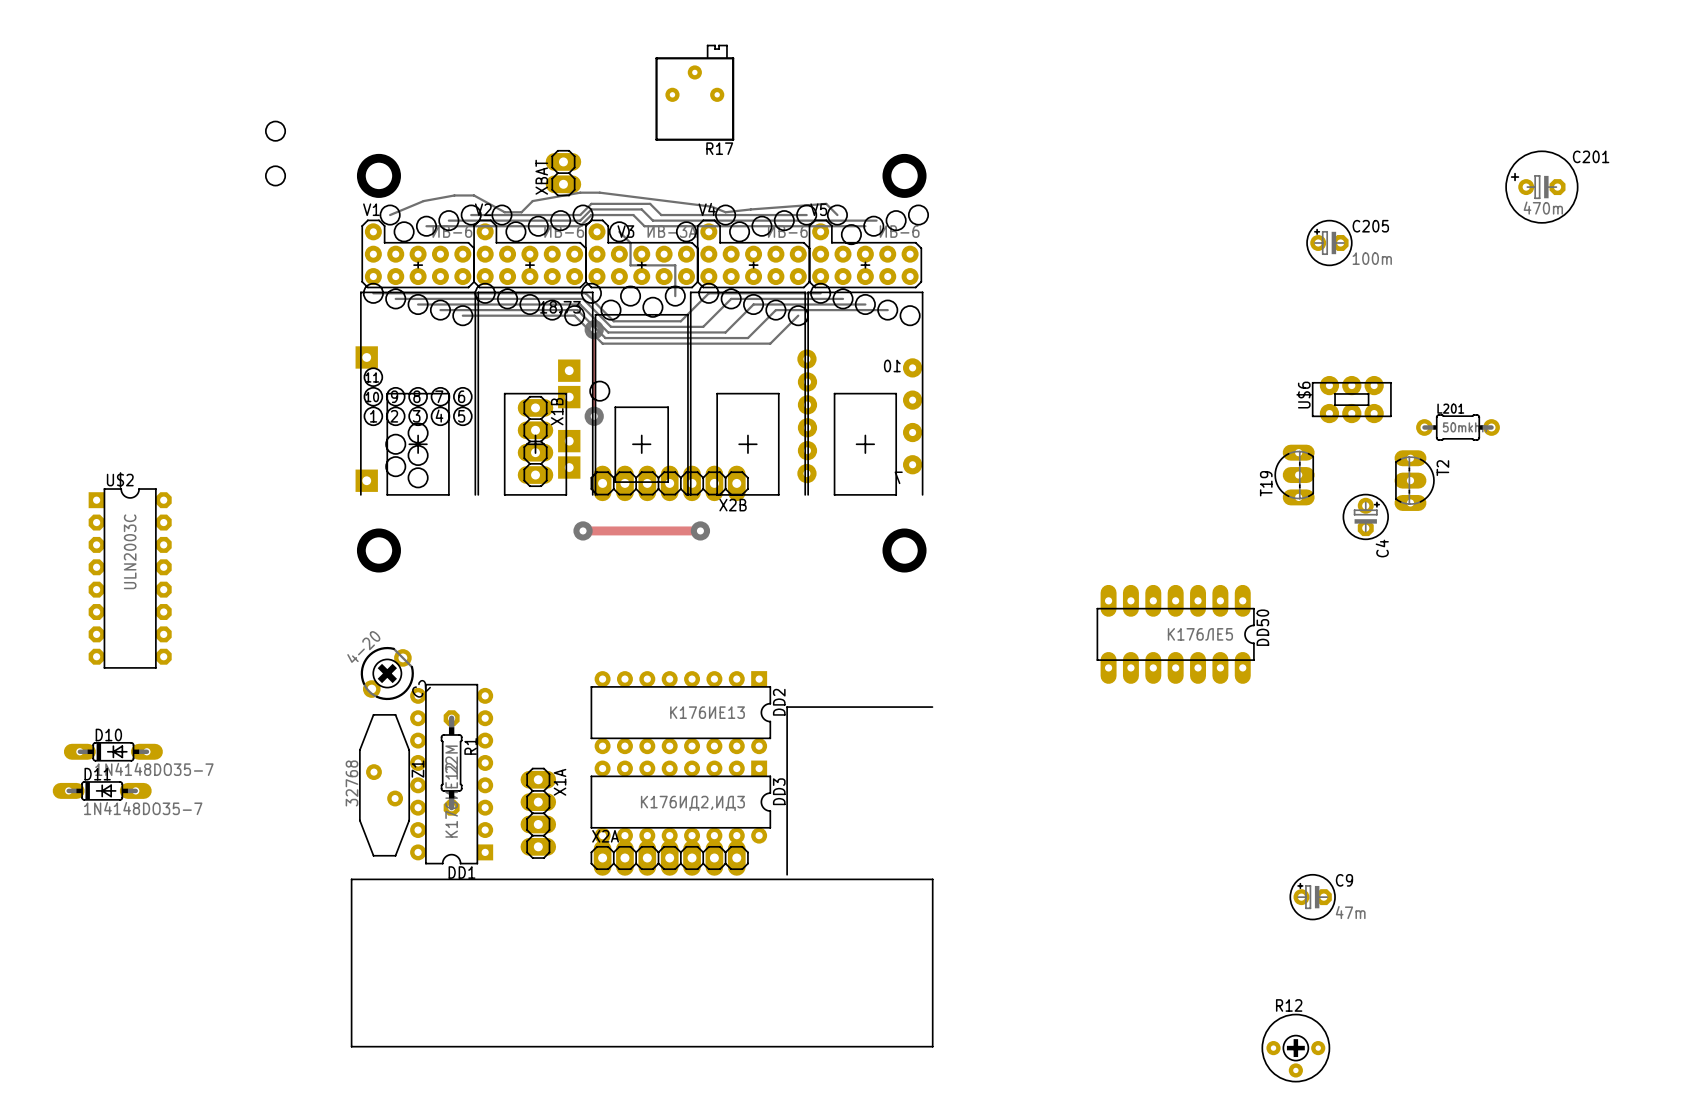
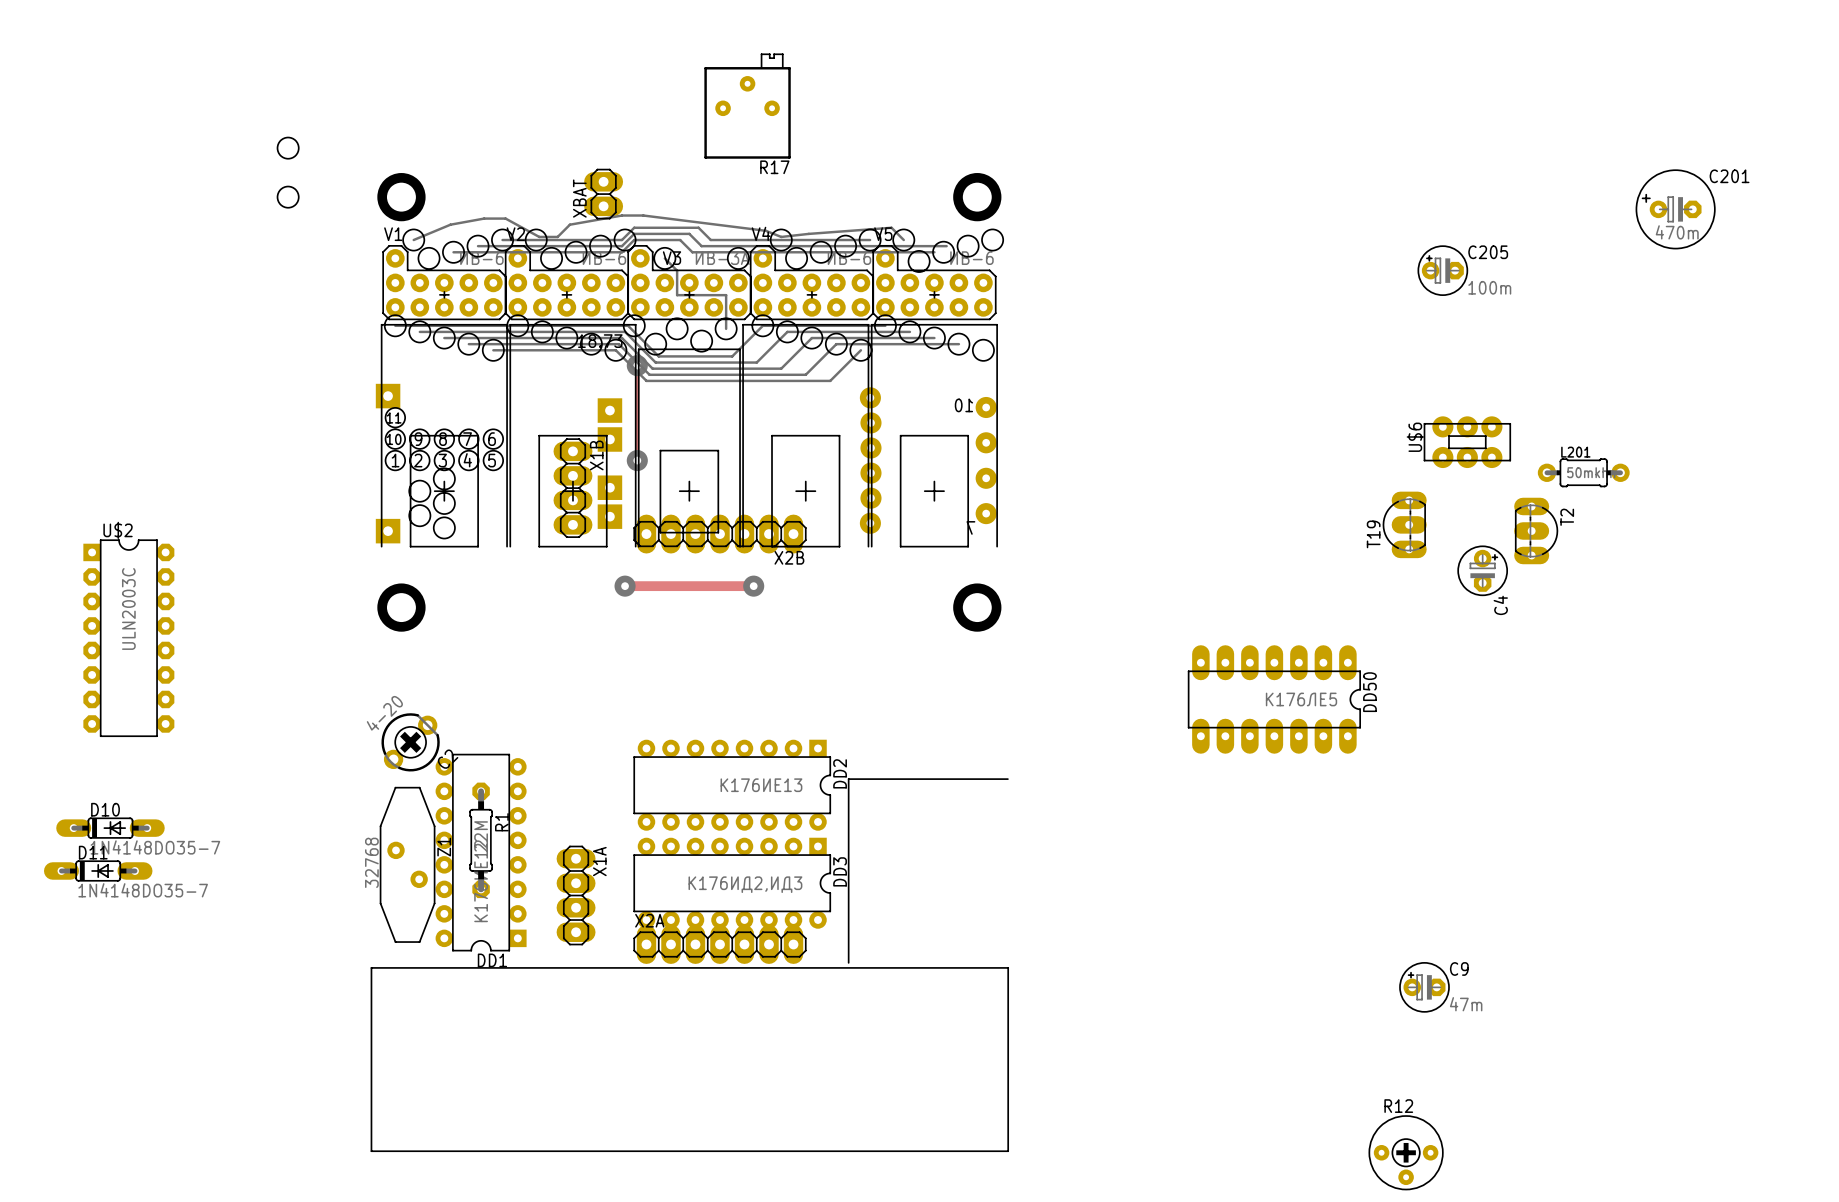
part: (599, 391) -> none

